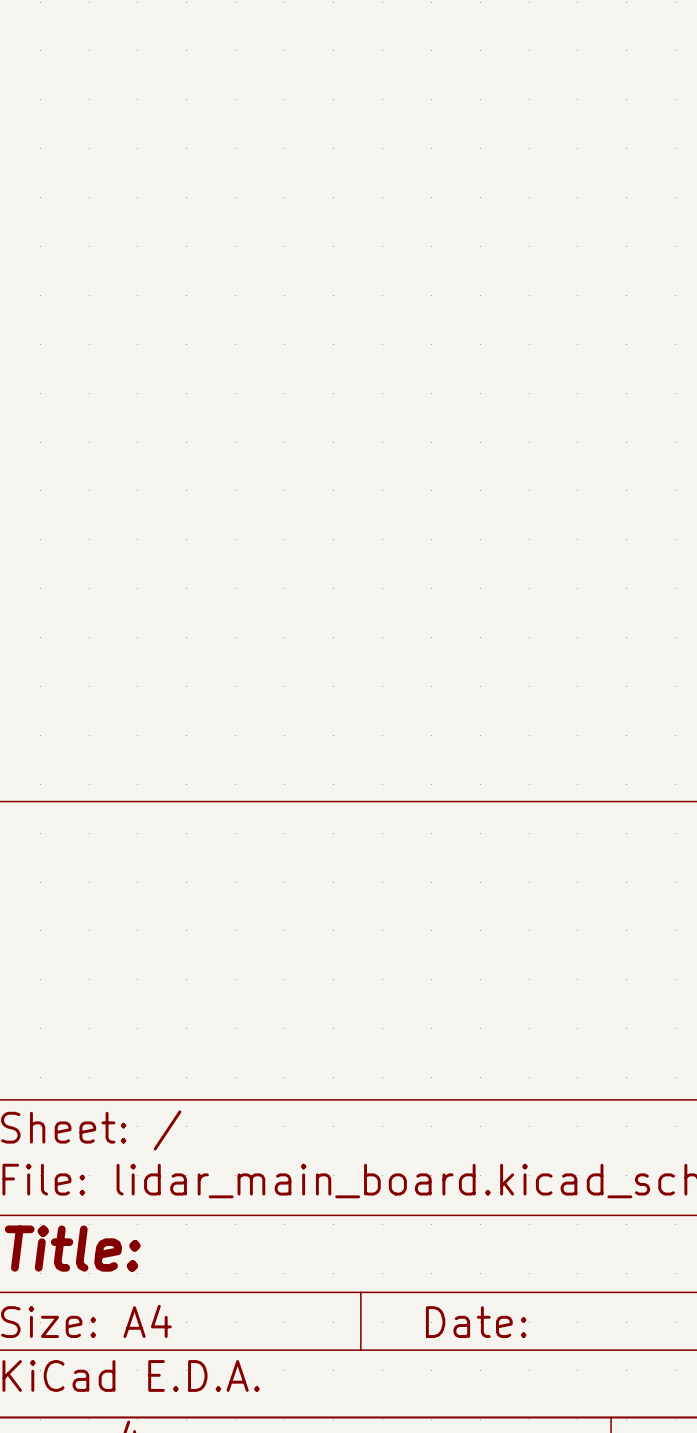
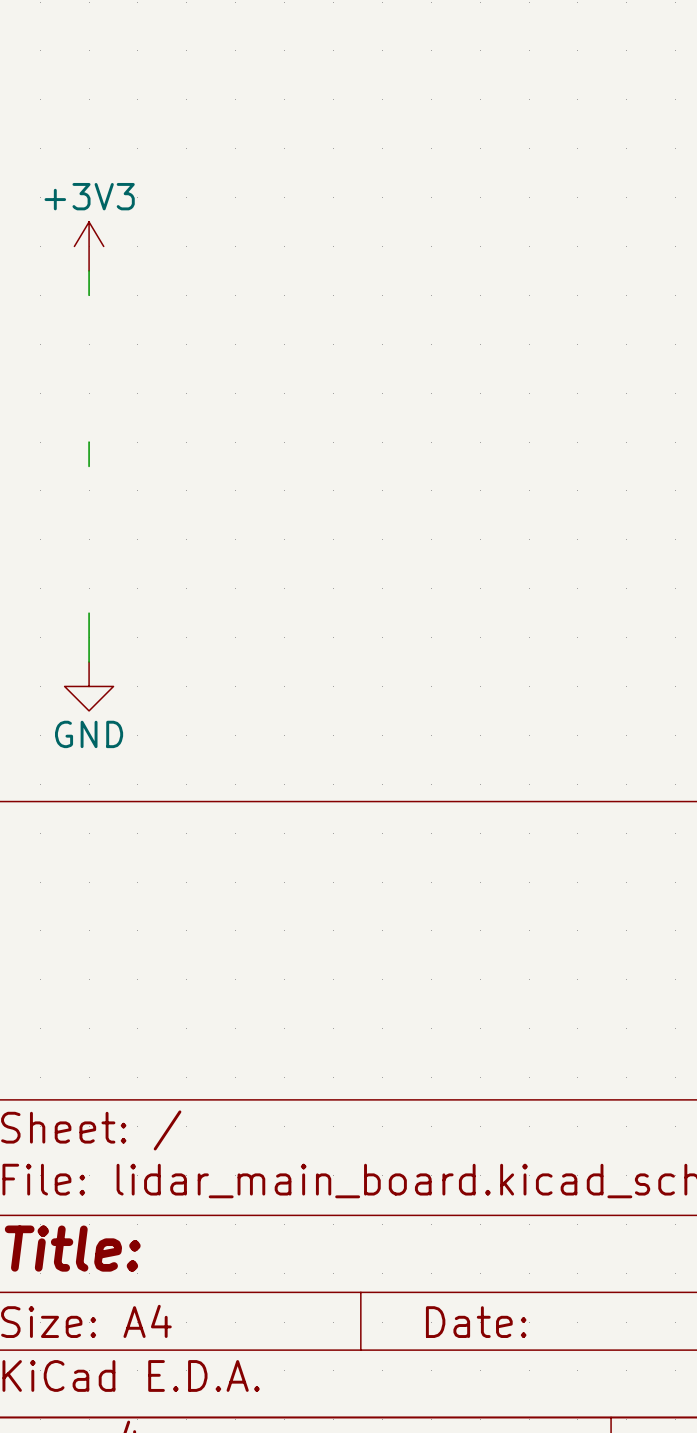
power symbol: none -> +3V3 (89, 246)
wire: none -> (89, 270) (89, 295)
wire: none -> (89, 442) (89, 466)
wire: none -> (89, 613) (89, 662)
power symbol: none -> GND (89, 686)

